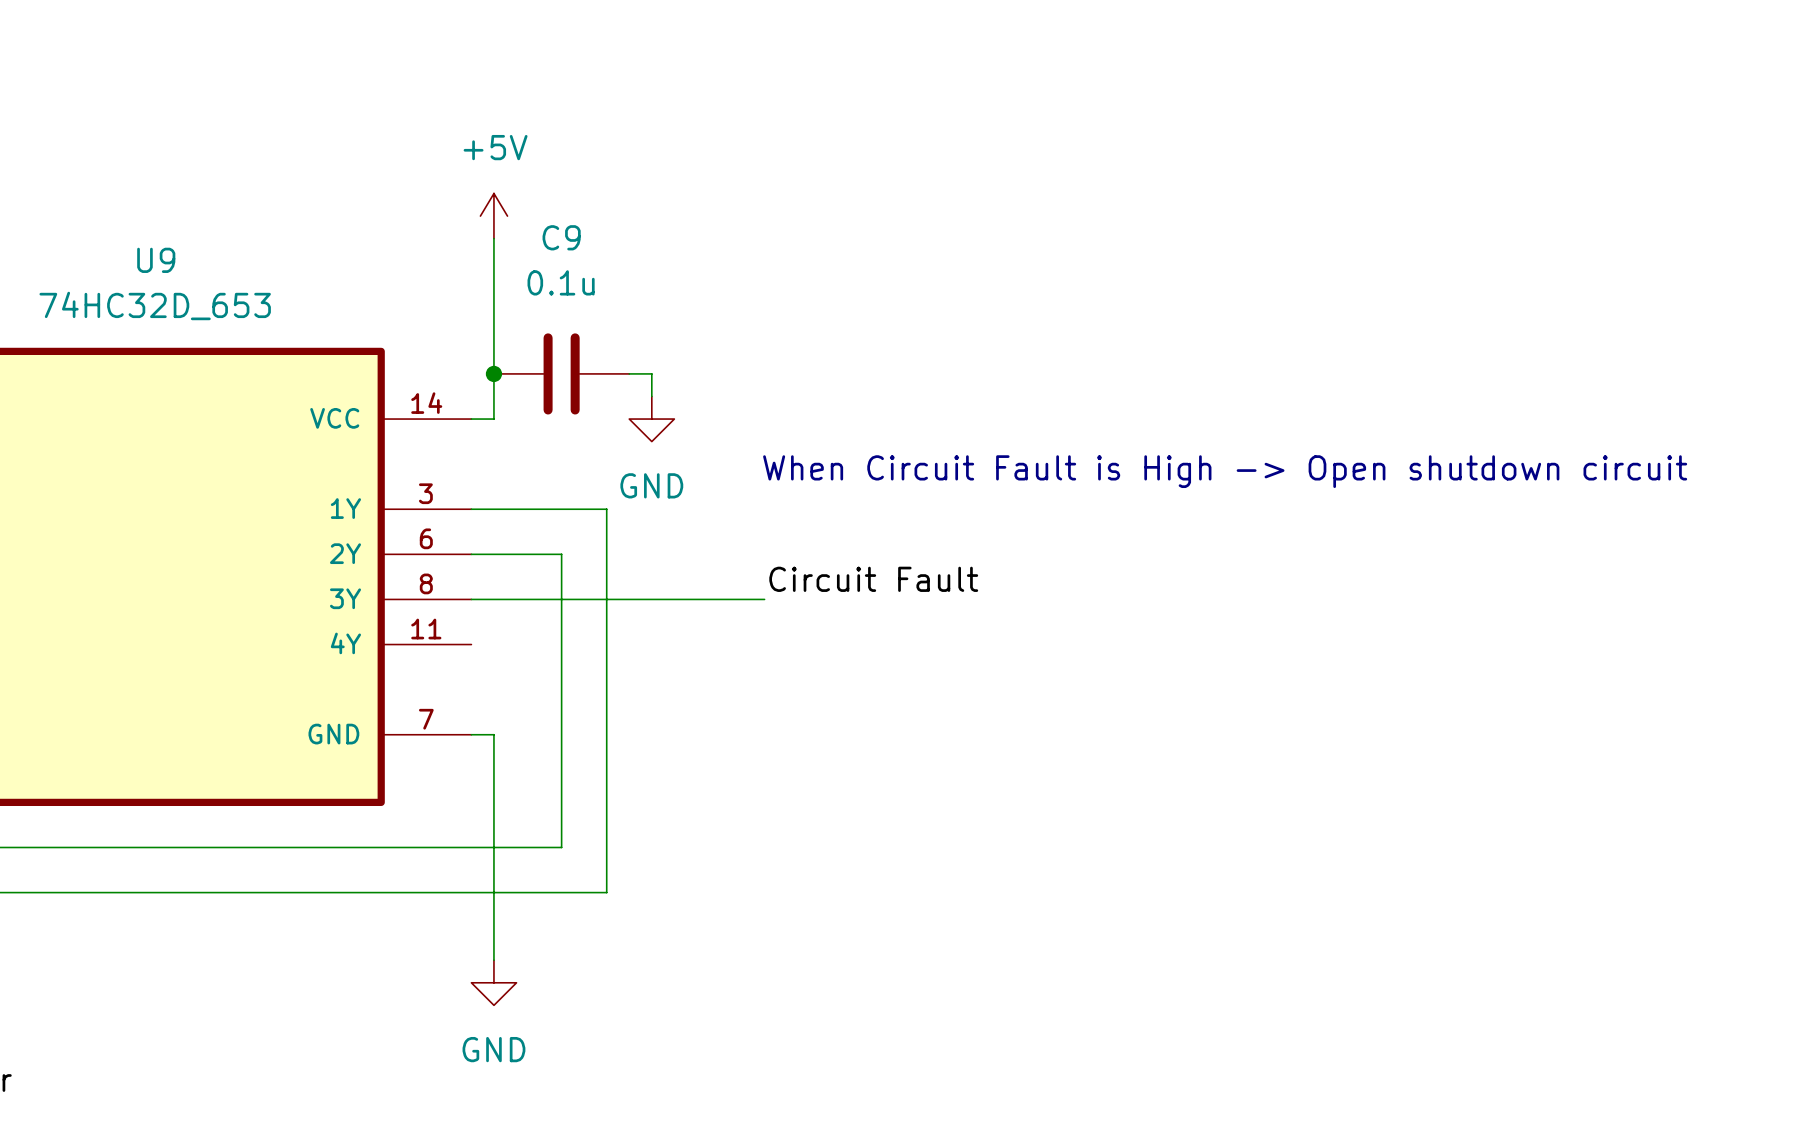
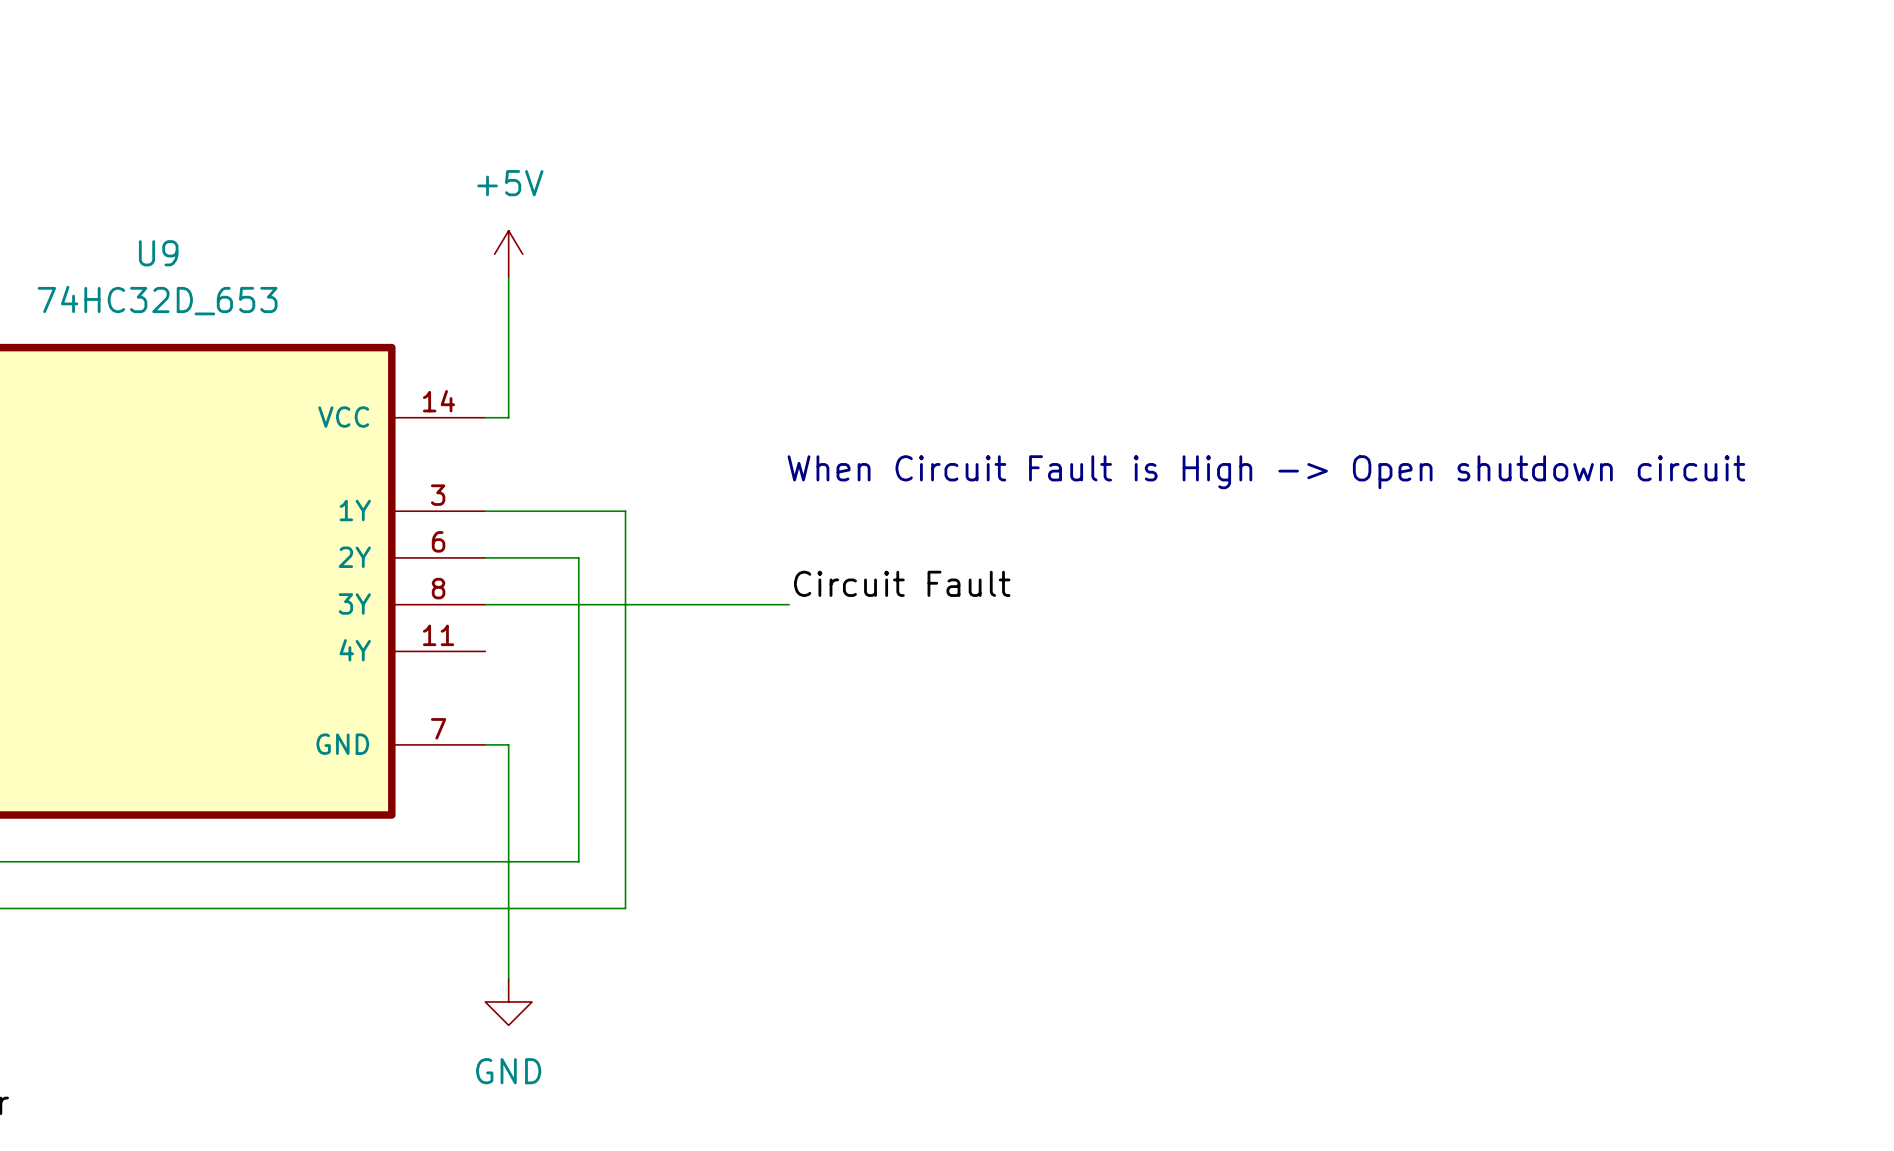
power symbol position: +5V (493, 216) -> +5V (508, 254)
junction: (493, 373) -> none
C9: 0.1u (561, 373) -> none
wire: (629, 373) (651, 373) (651, 396) -> none
power symbol: GND (651, 419) -> none

